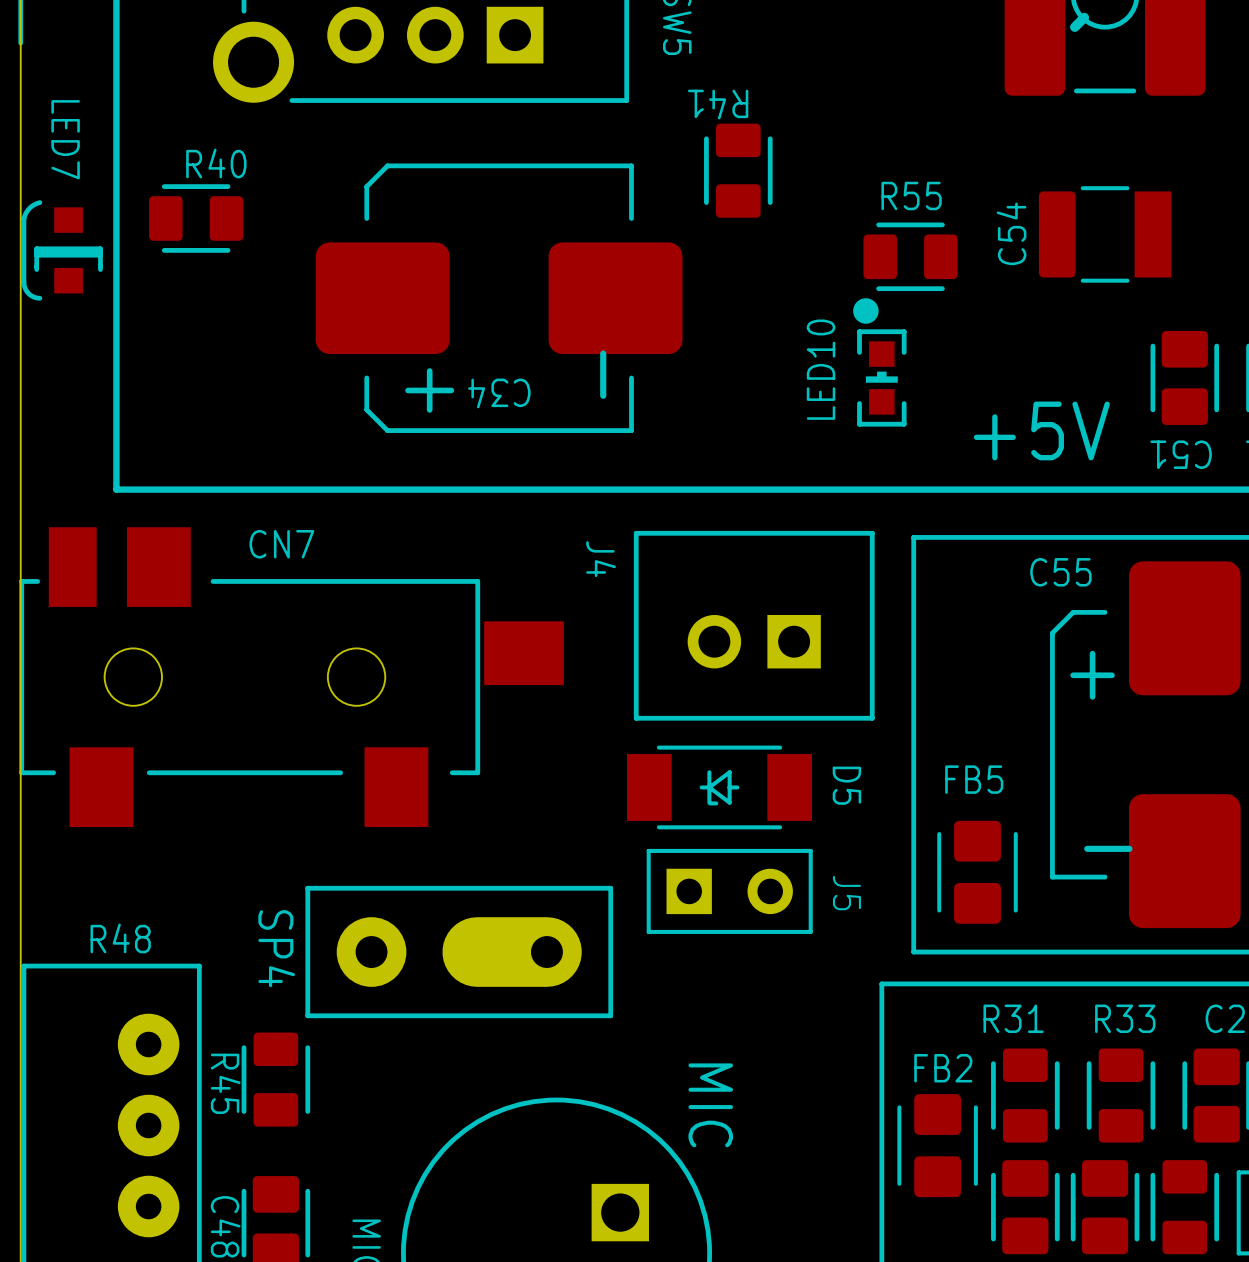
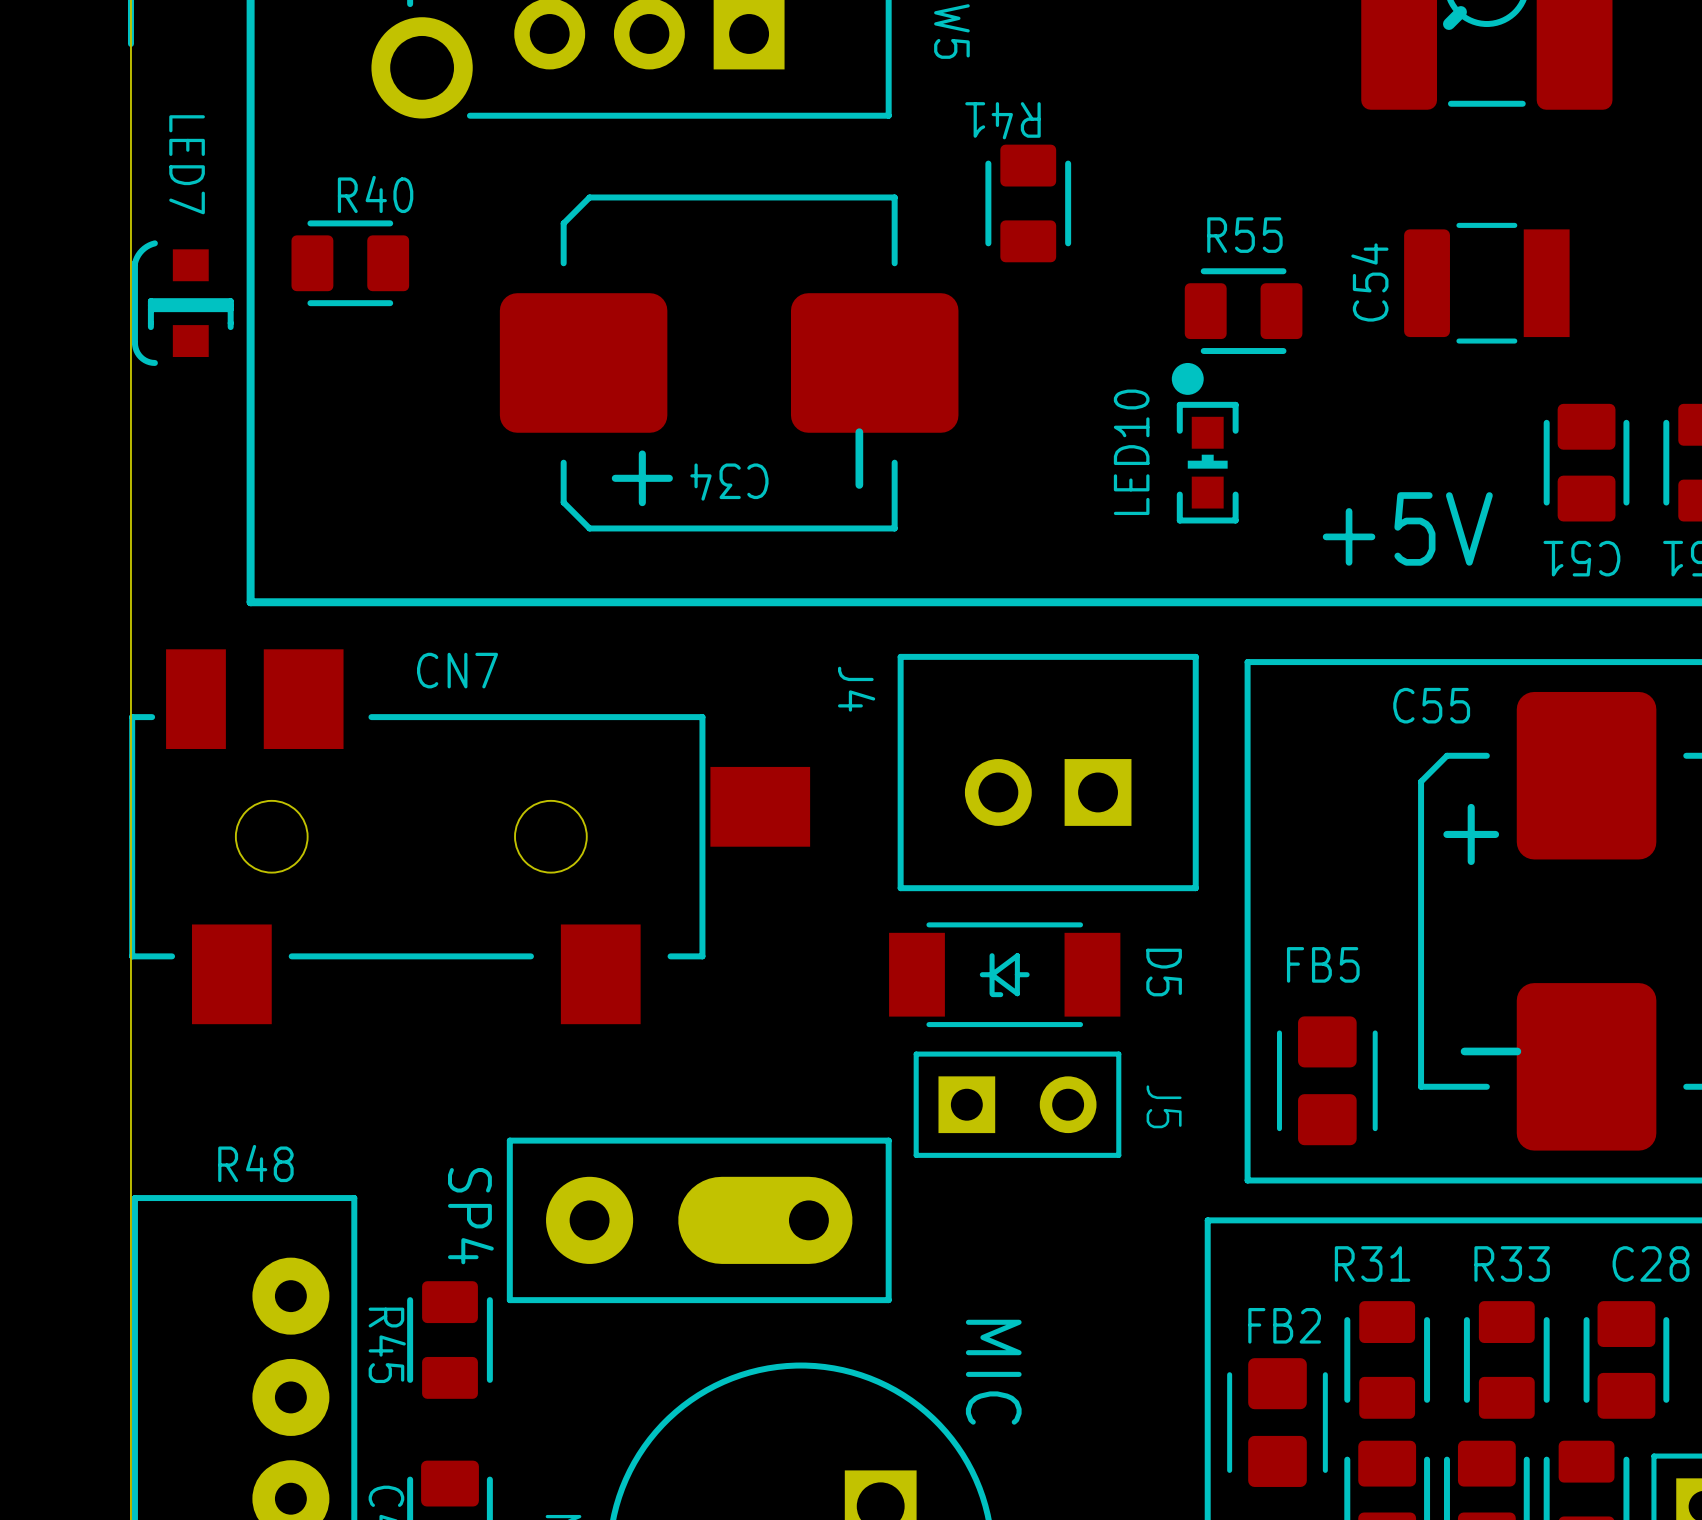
SP4 position: (459, 952) -> (699, 1220)

